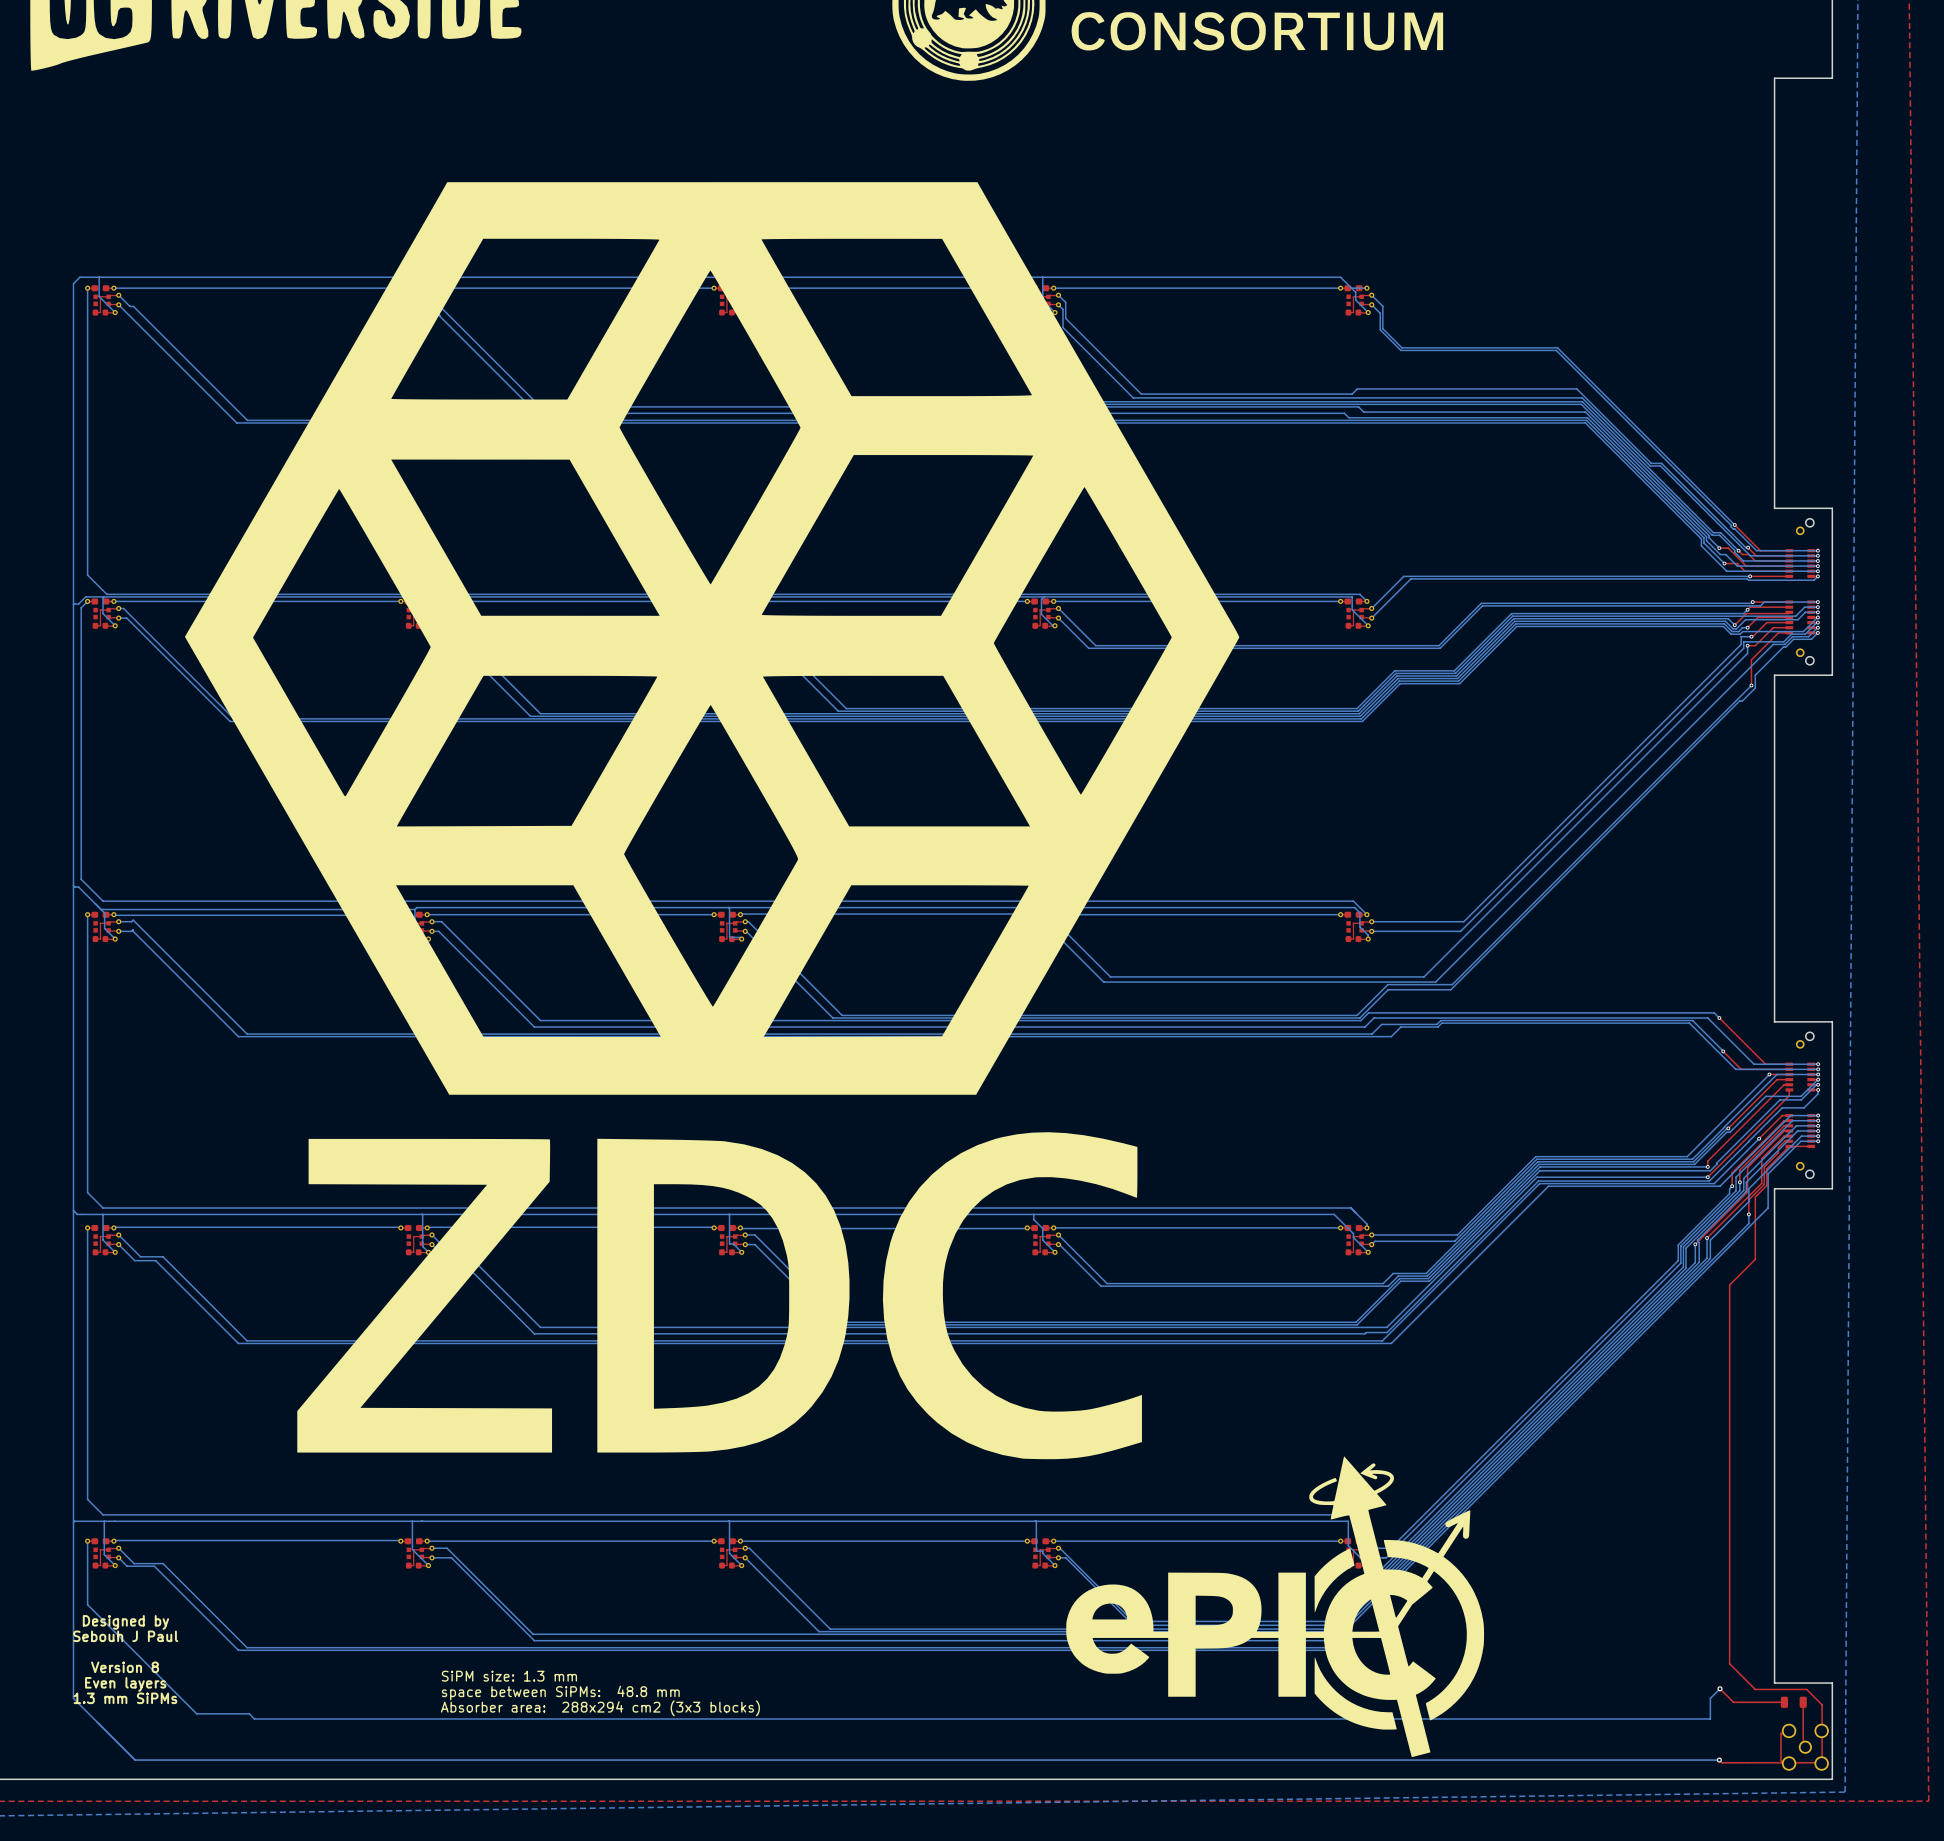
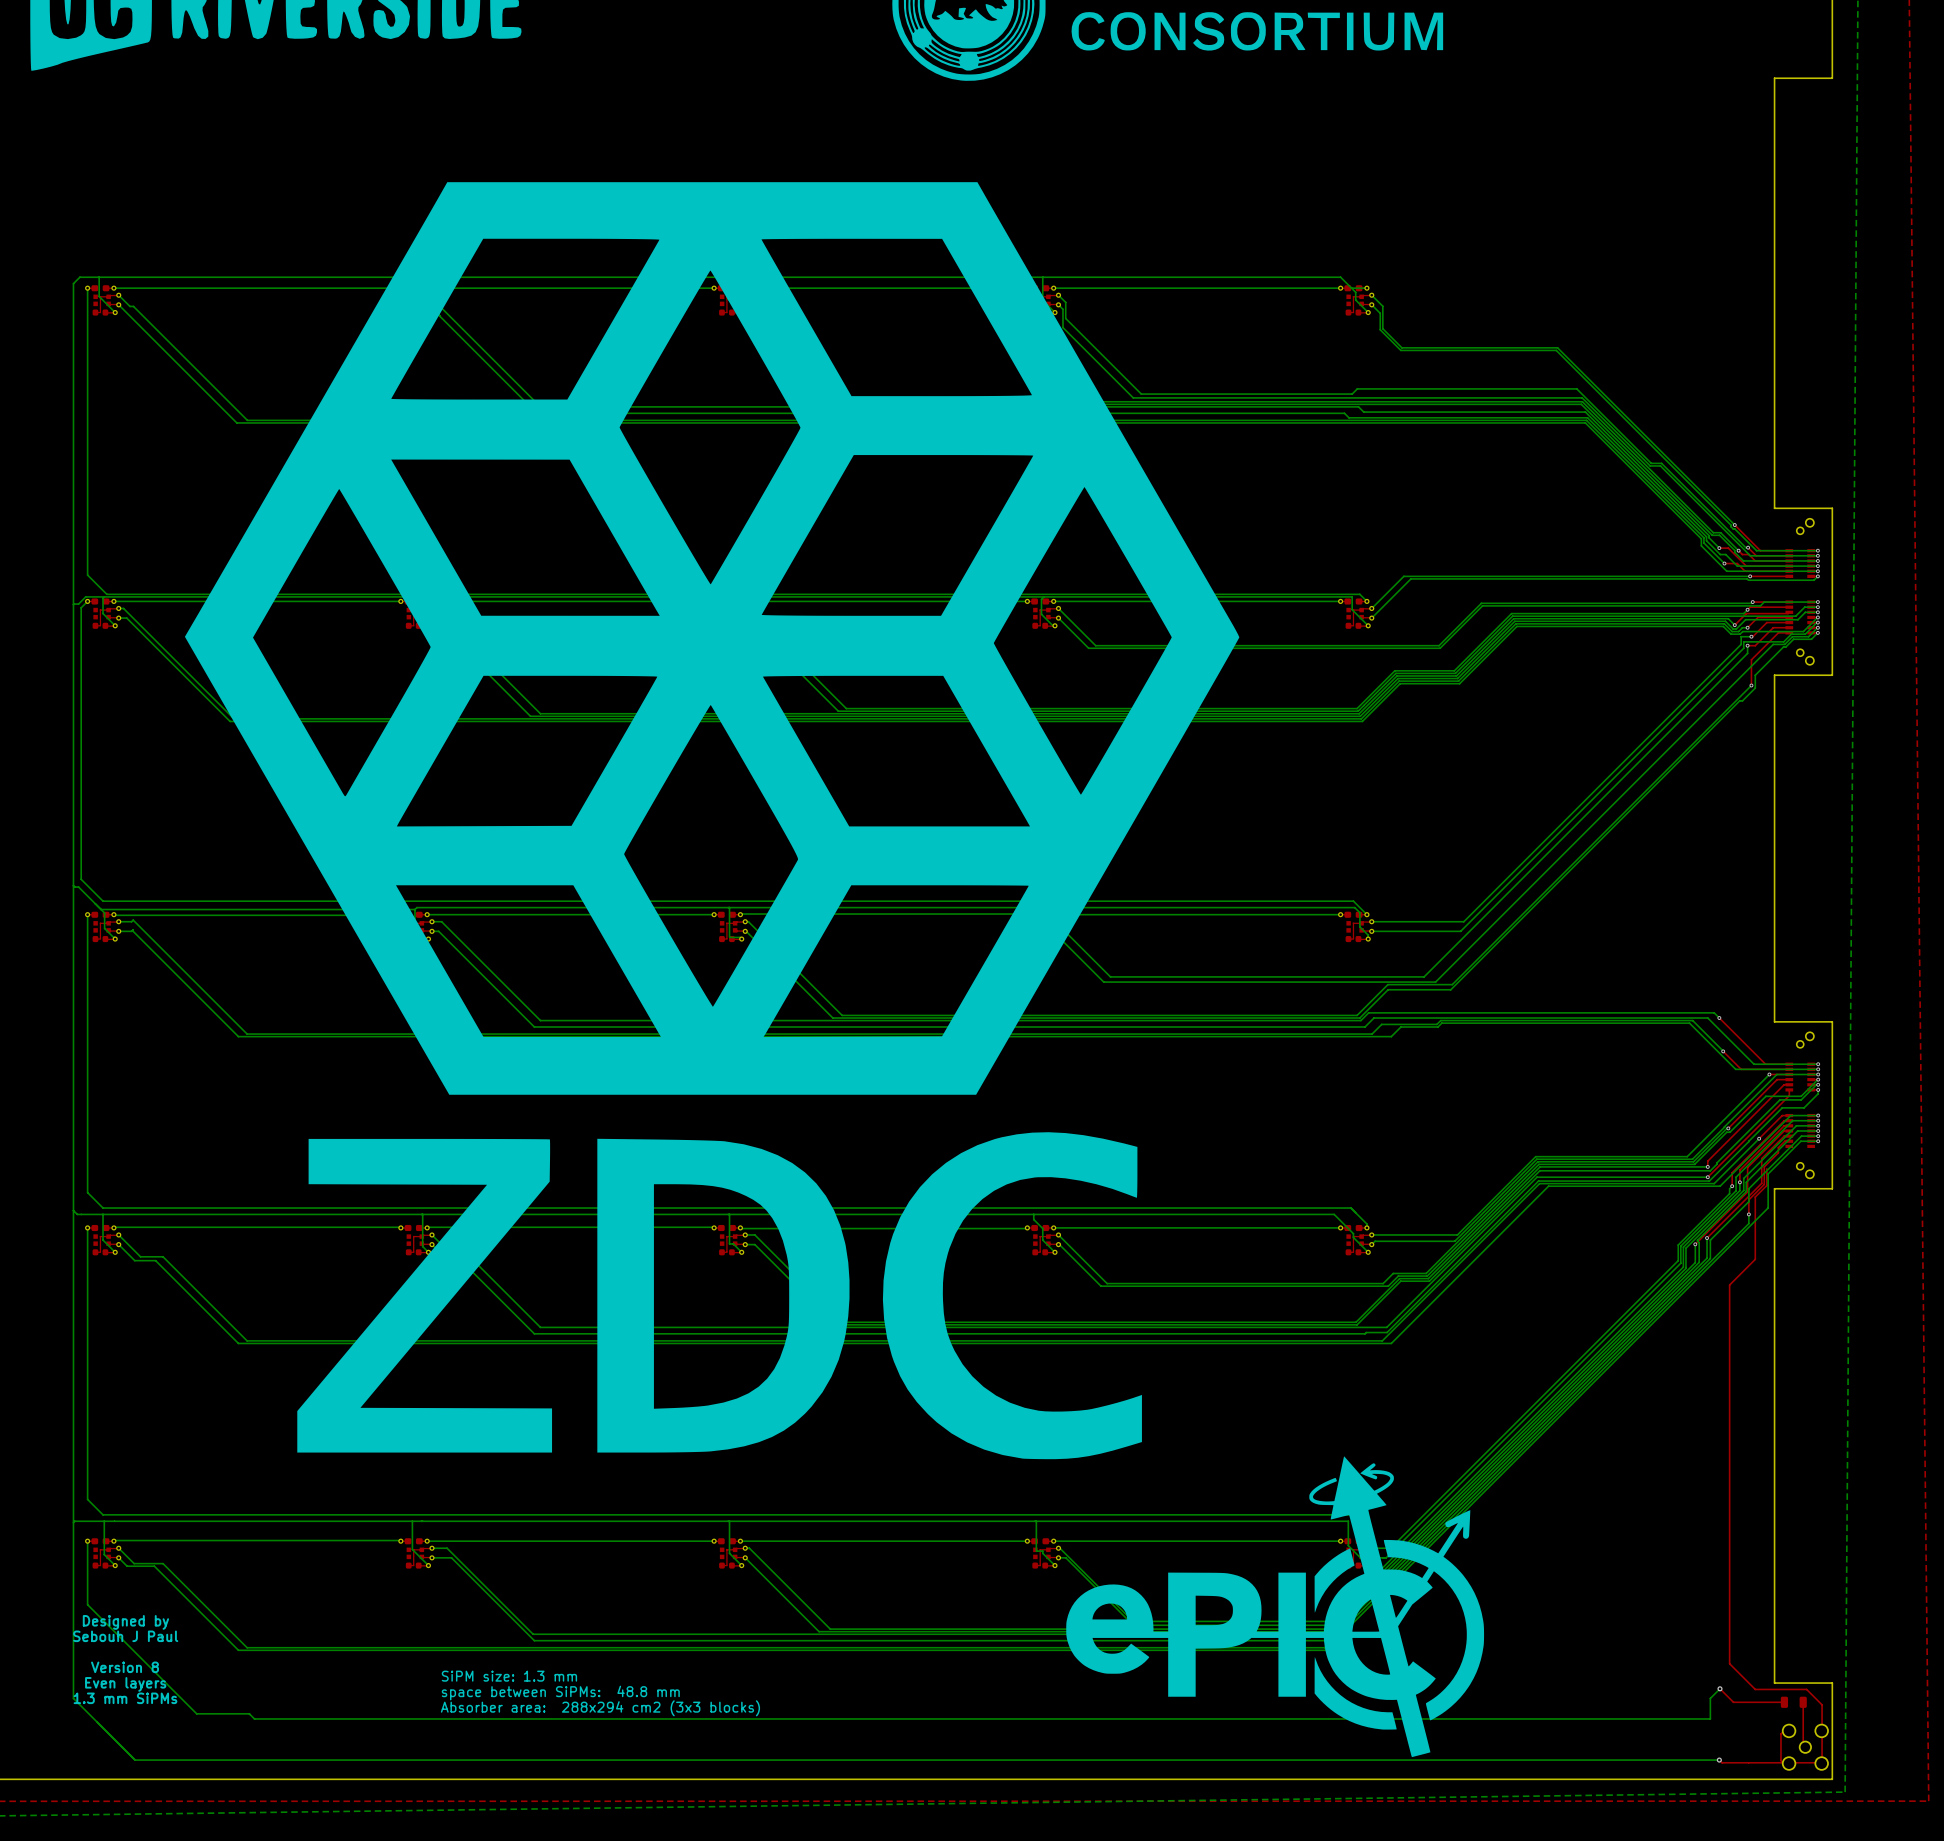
top track: (1811, 1146) (1789, 1146) (1766, 1168) -> none

